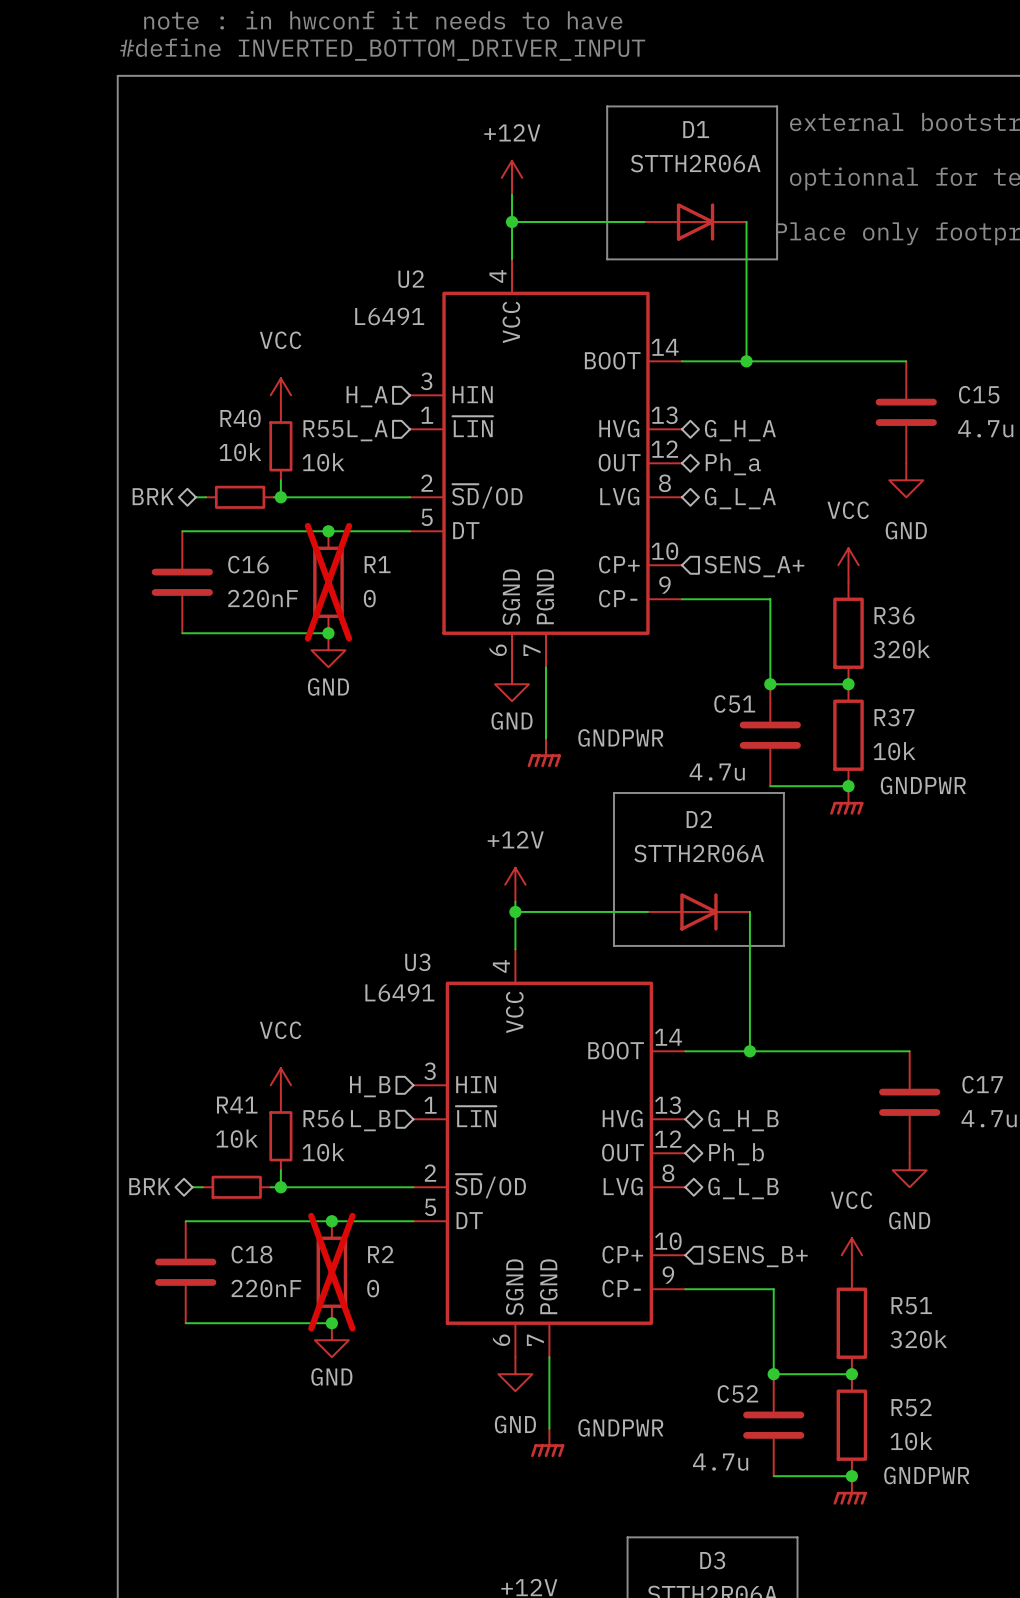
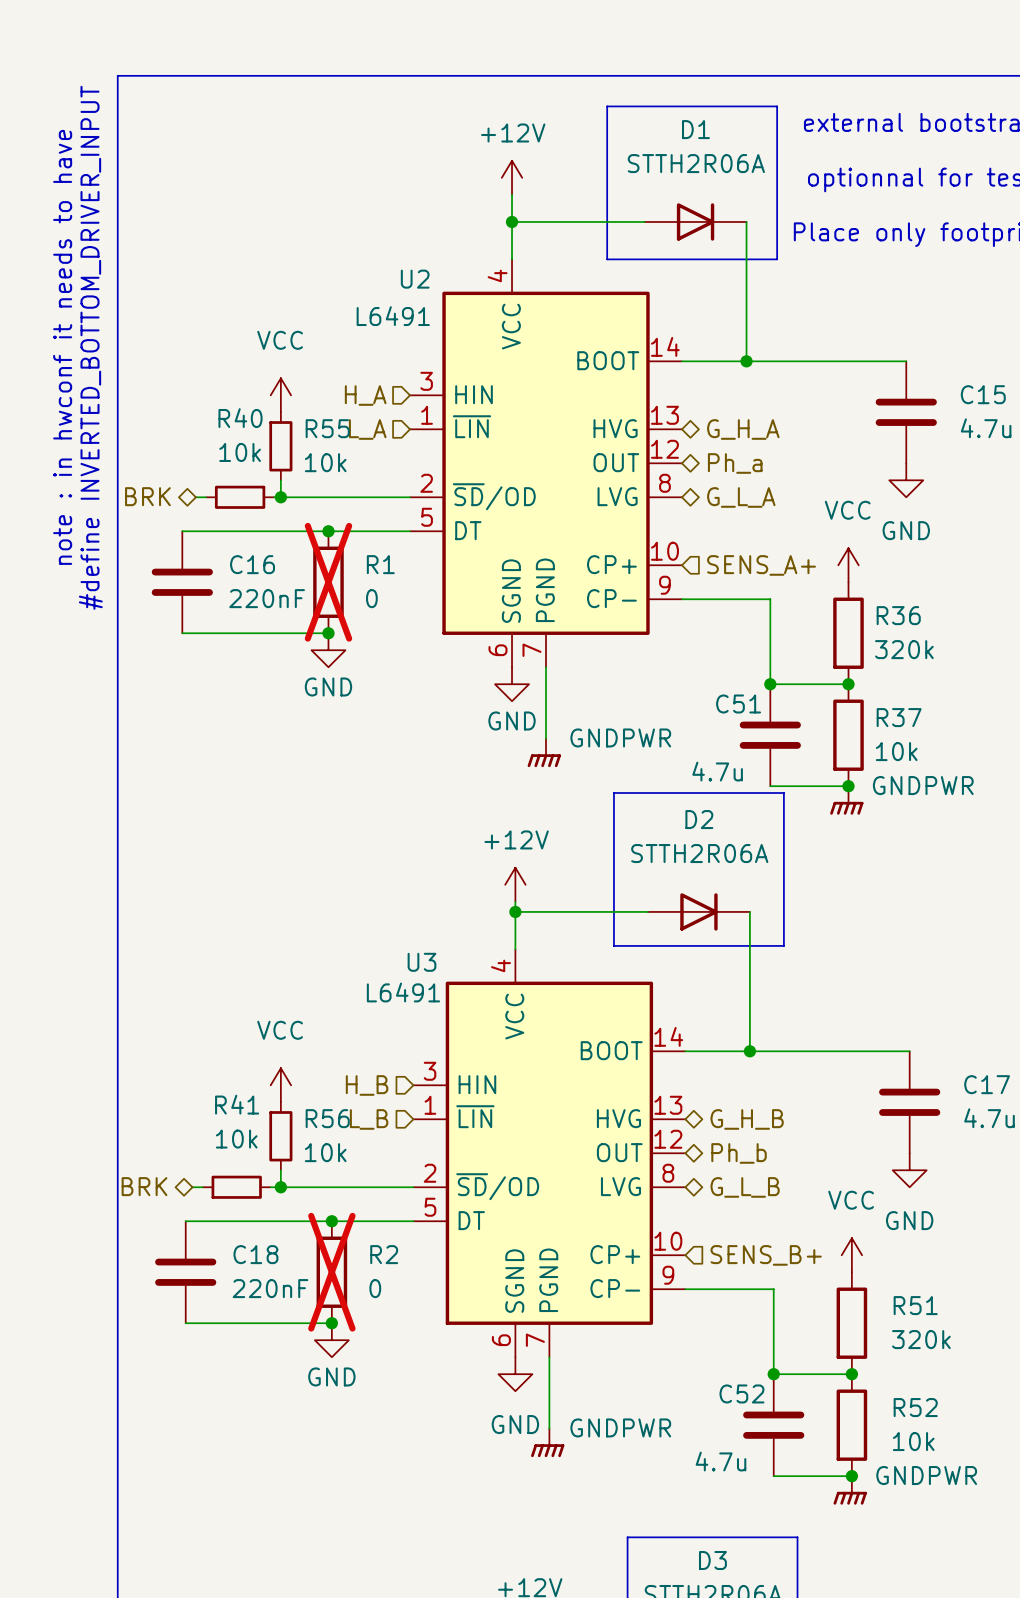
text: note : in hwconf it needs to have (383, 20) -> none
text: #define INVERTED_BOTTOM_DRIVER_INPUT (382, 49) -> none
text: none -> note : in hwconf it needs to have (62, 347)
text: none -> #define INVERTED_BOTTOM_DRIVER_INPUT (90, 347)

